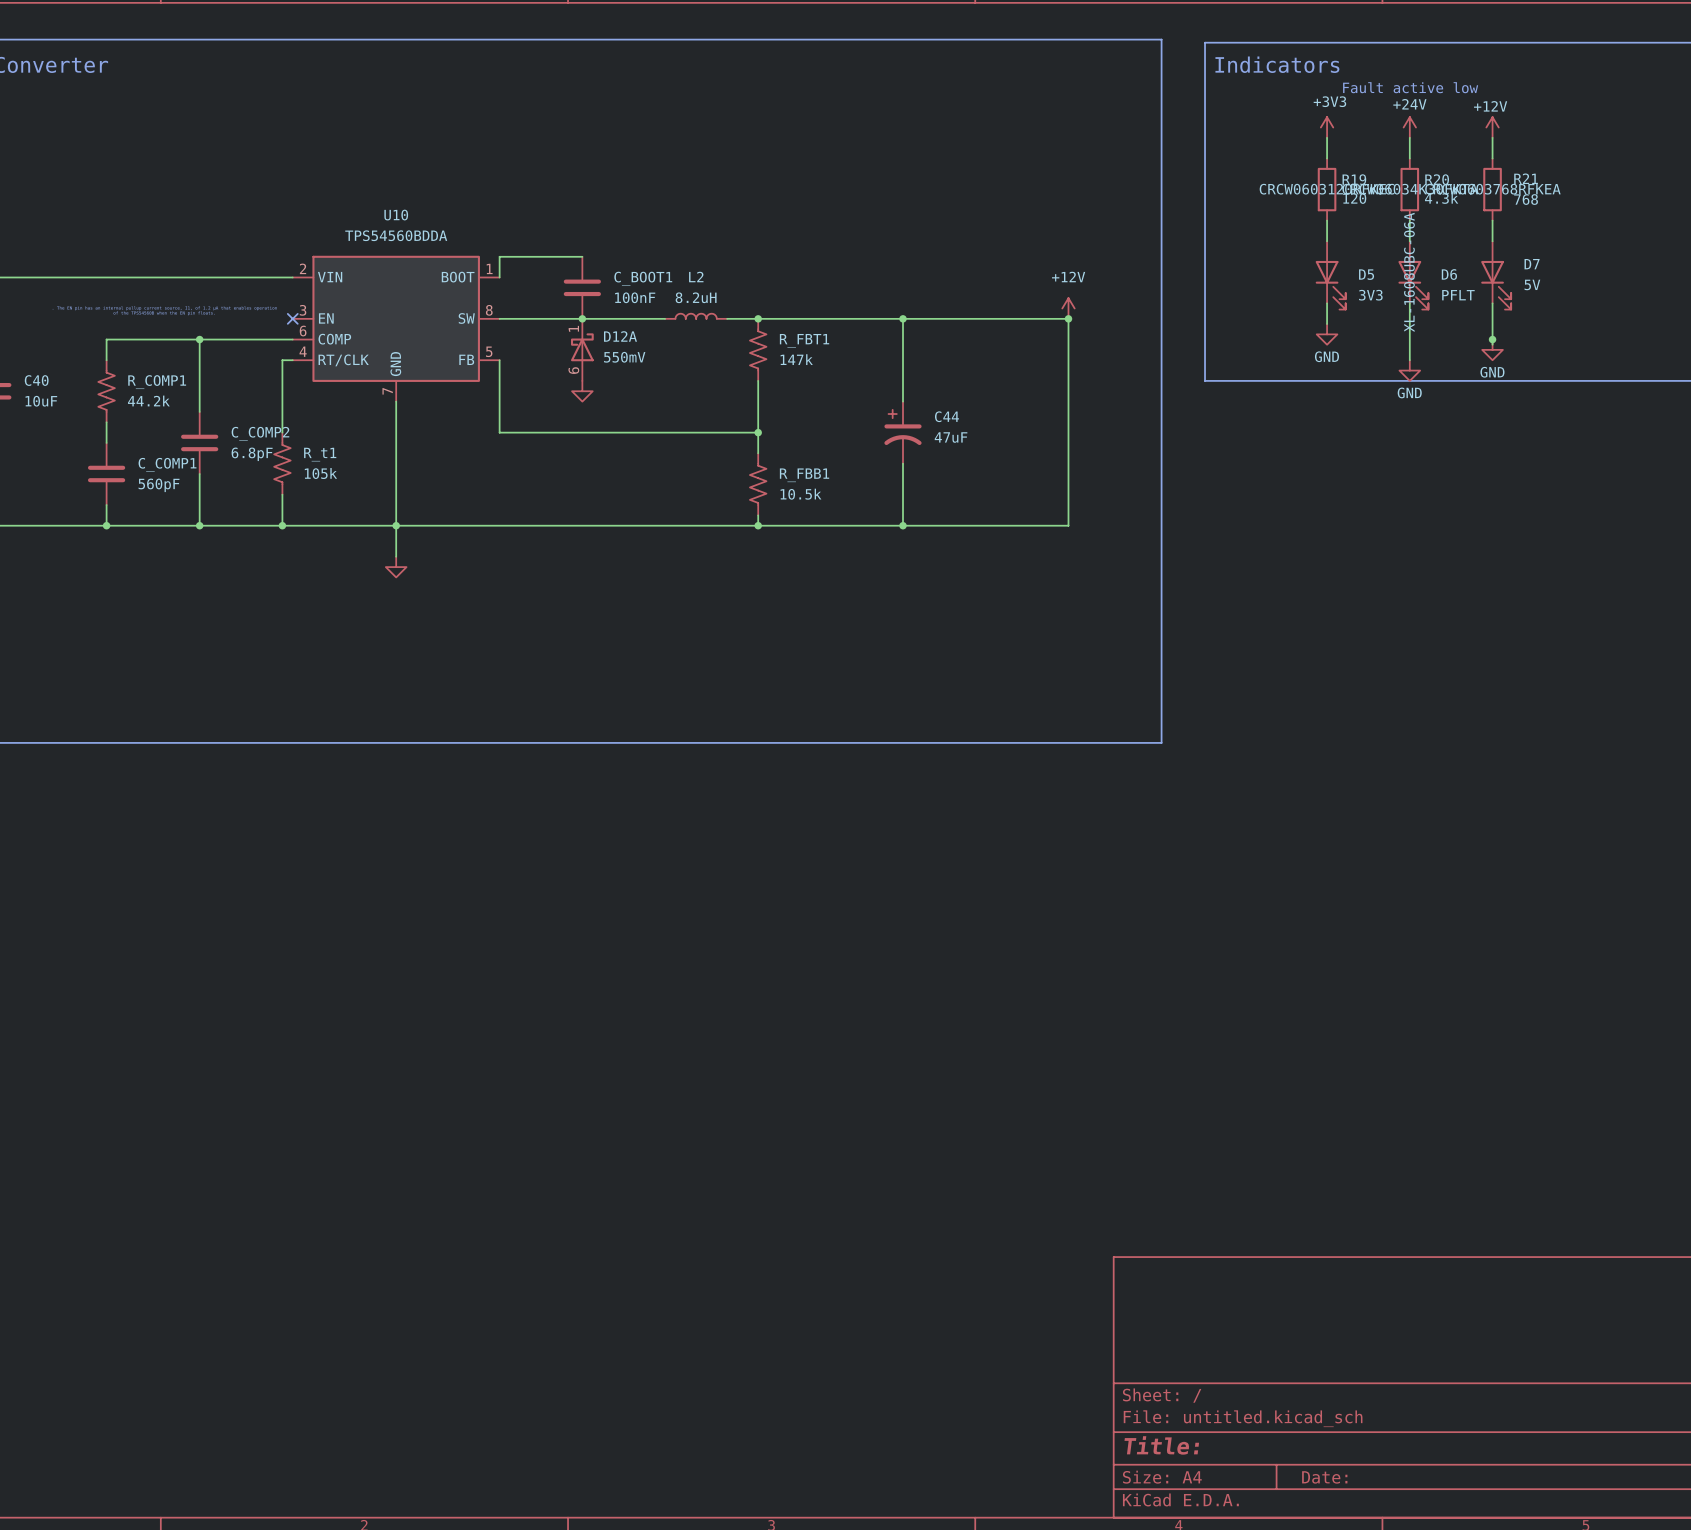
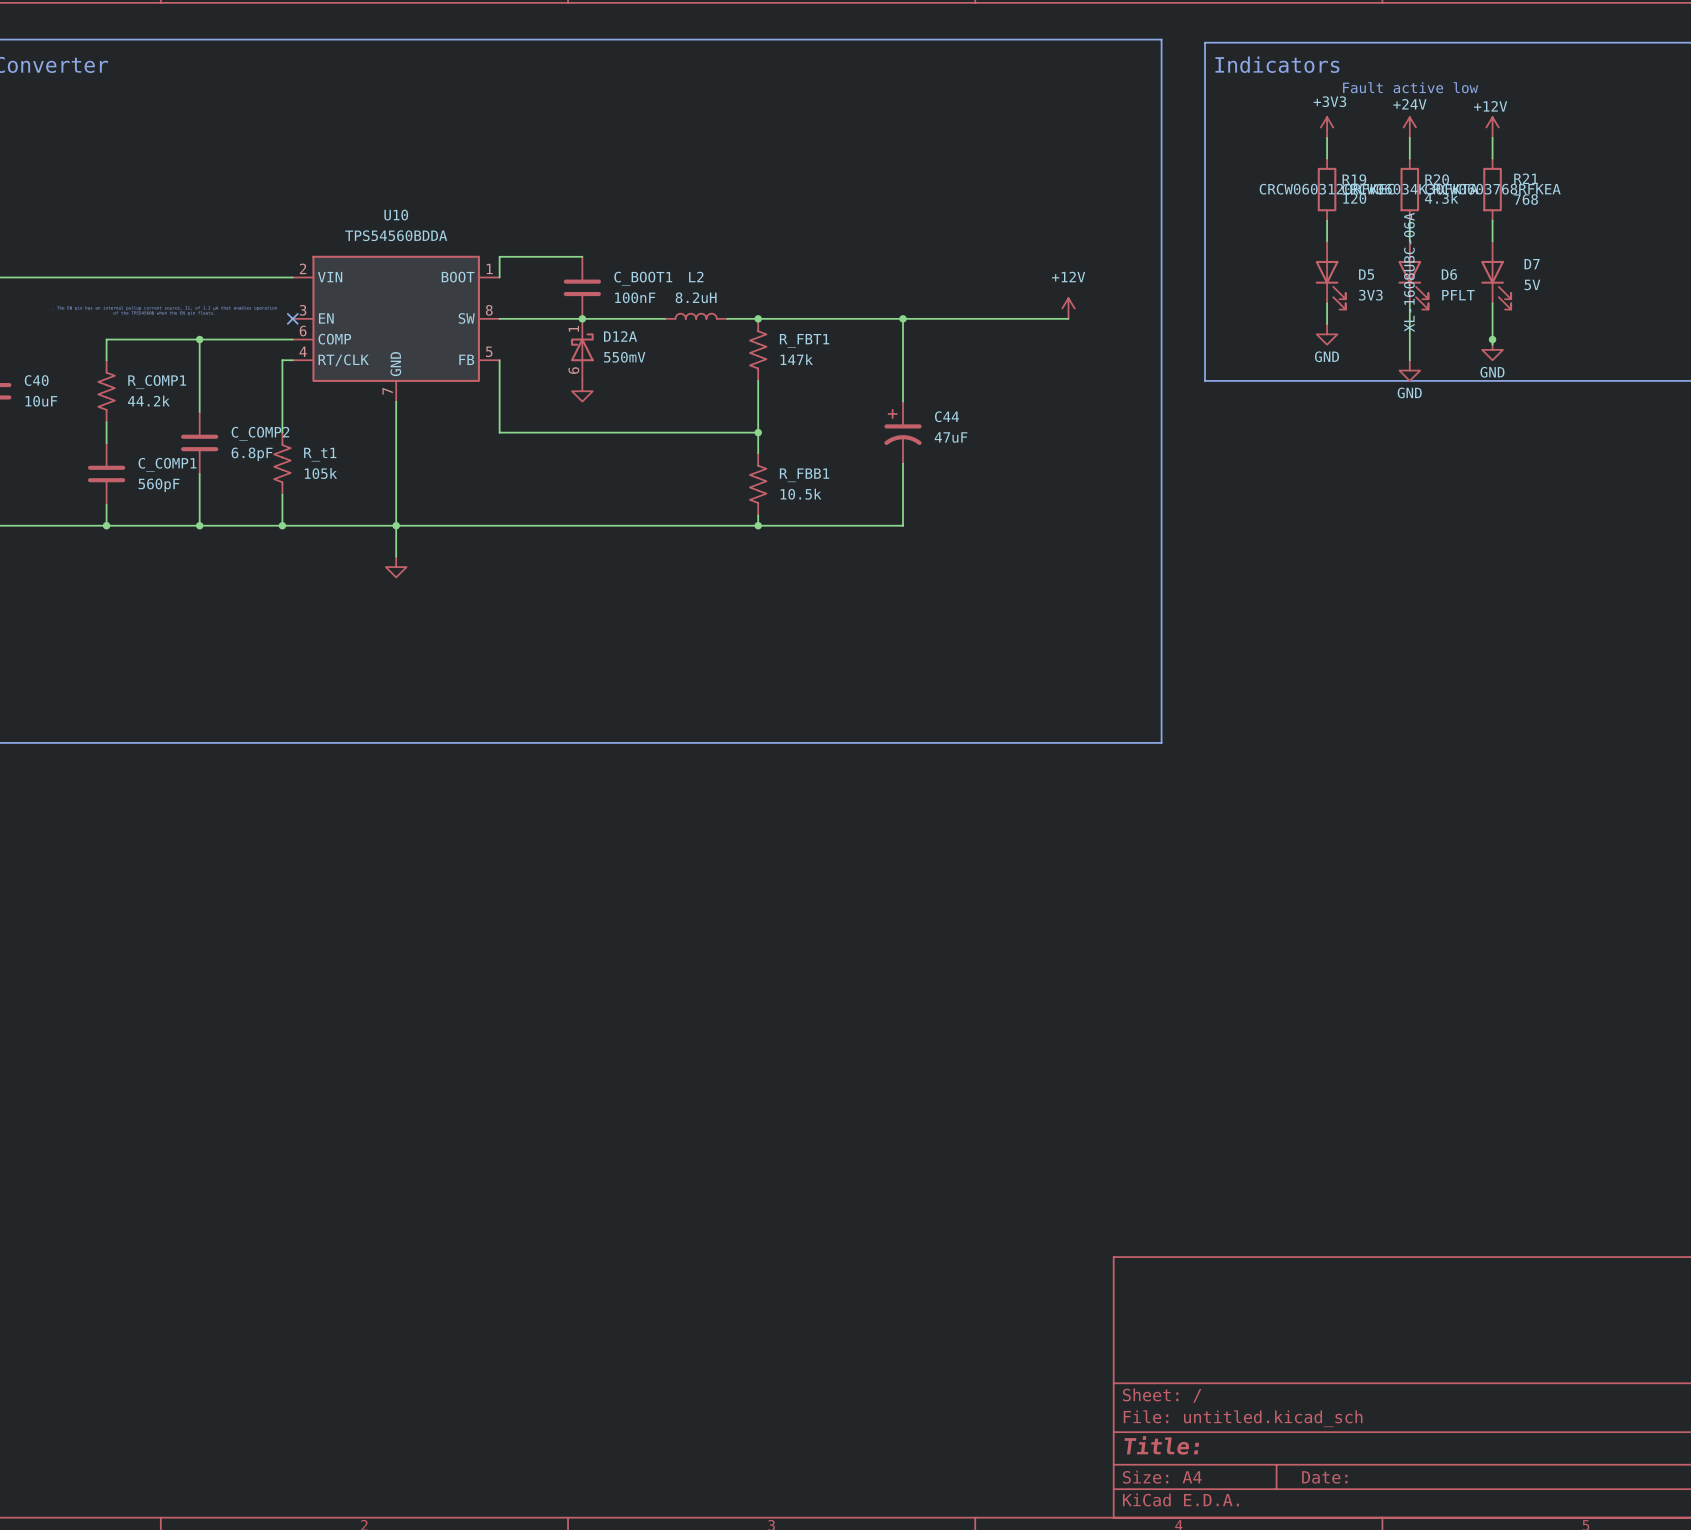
wire: (1068, 318) (1068, 525) (903, 525) -> none
junction: (1068, 318) -> none
junction: (903, 525) -> none

